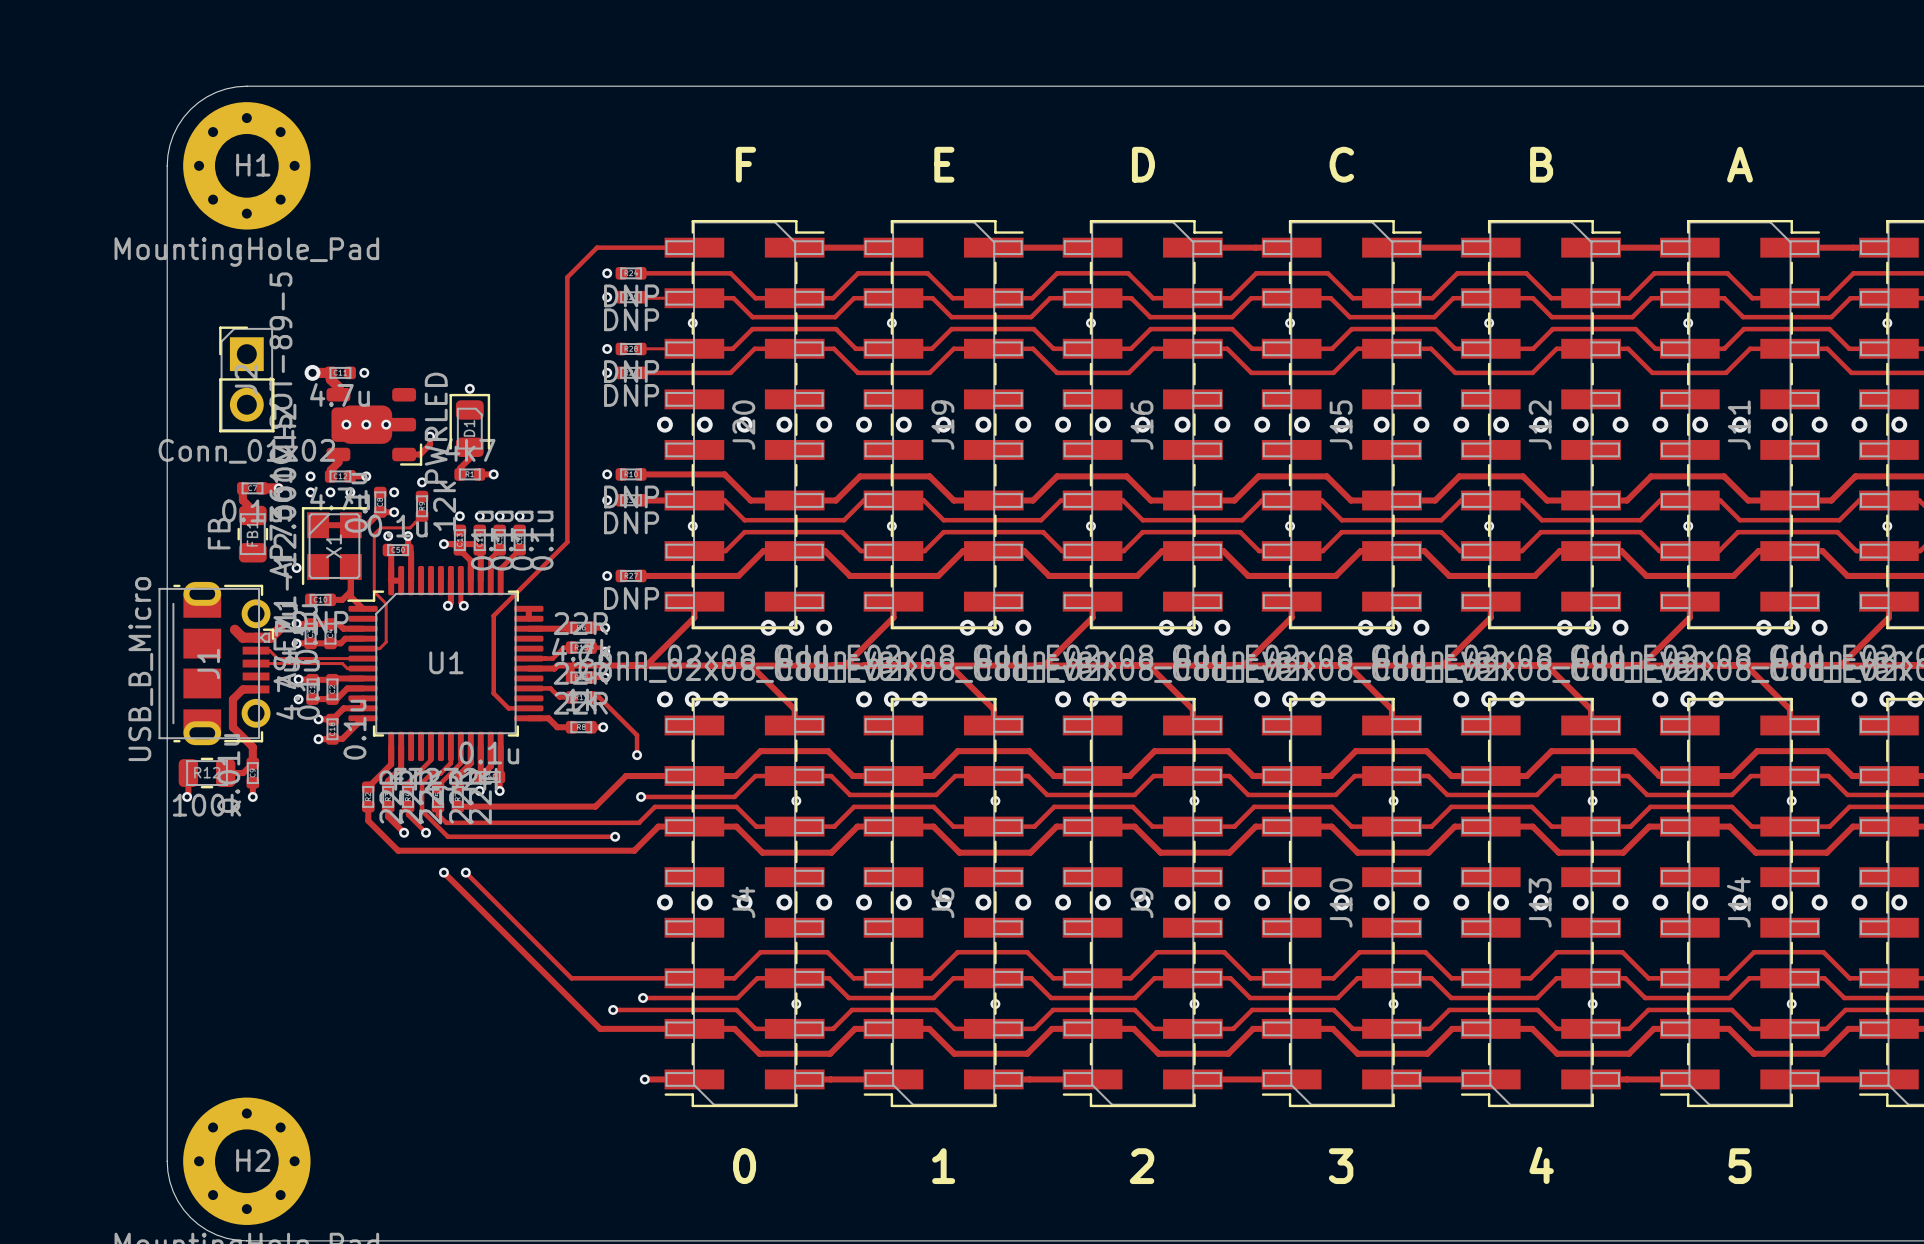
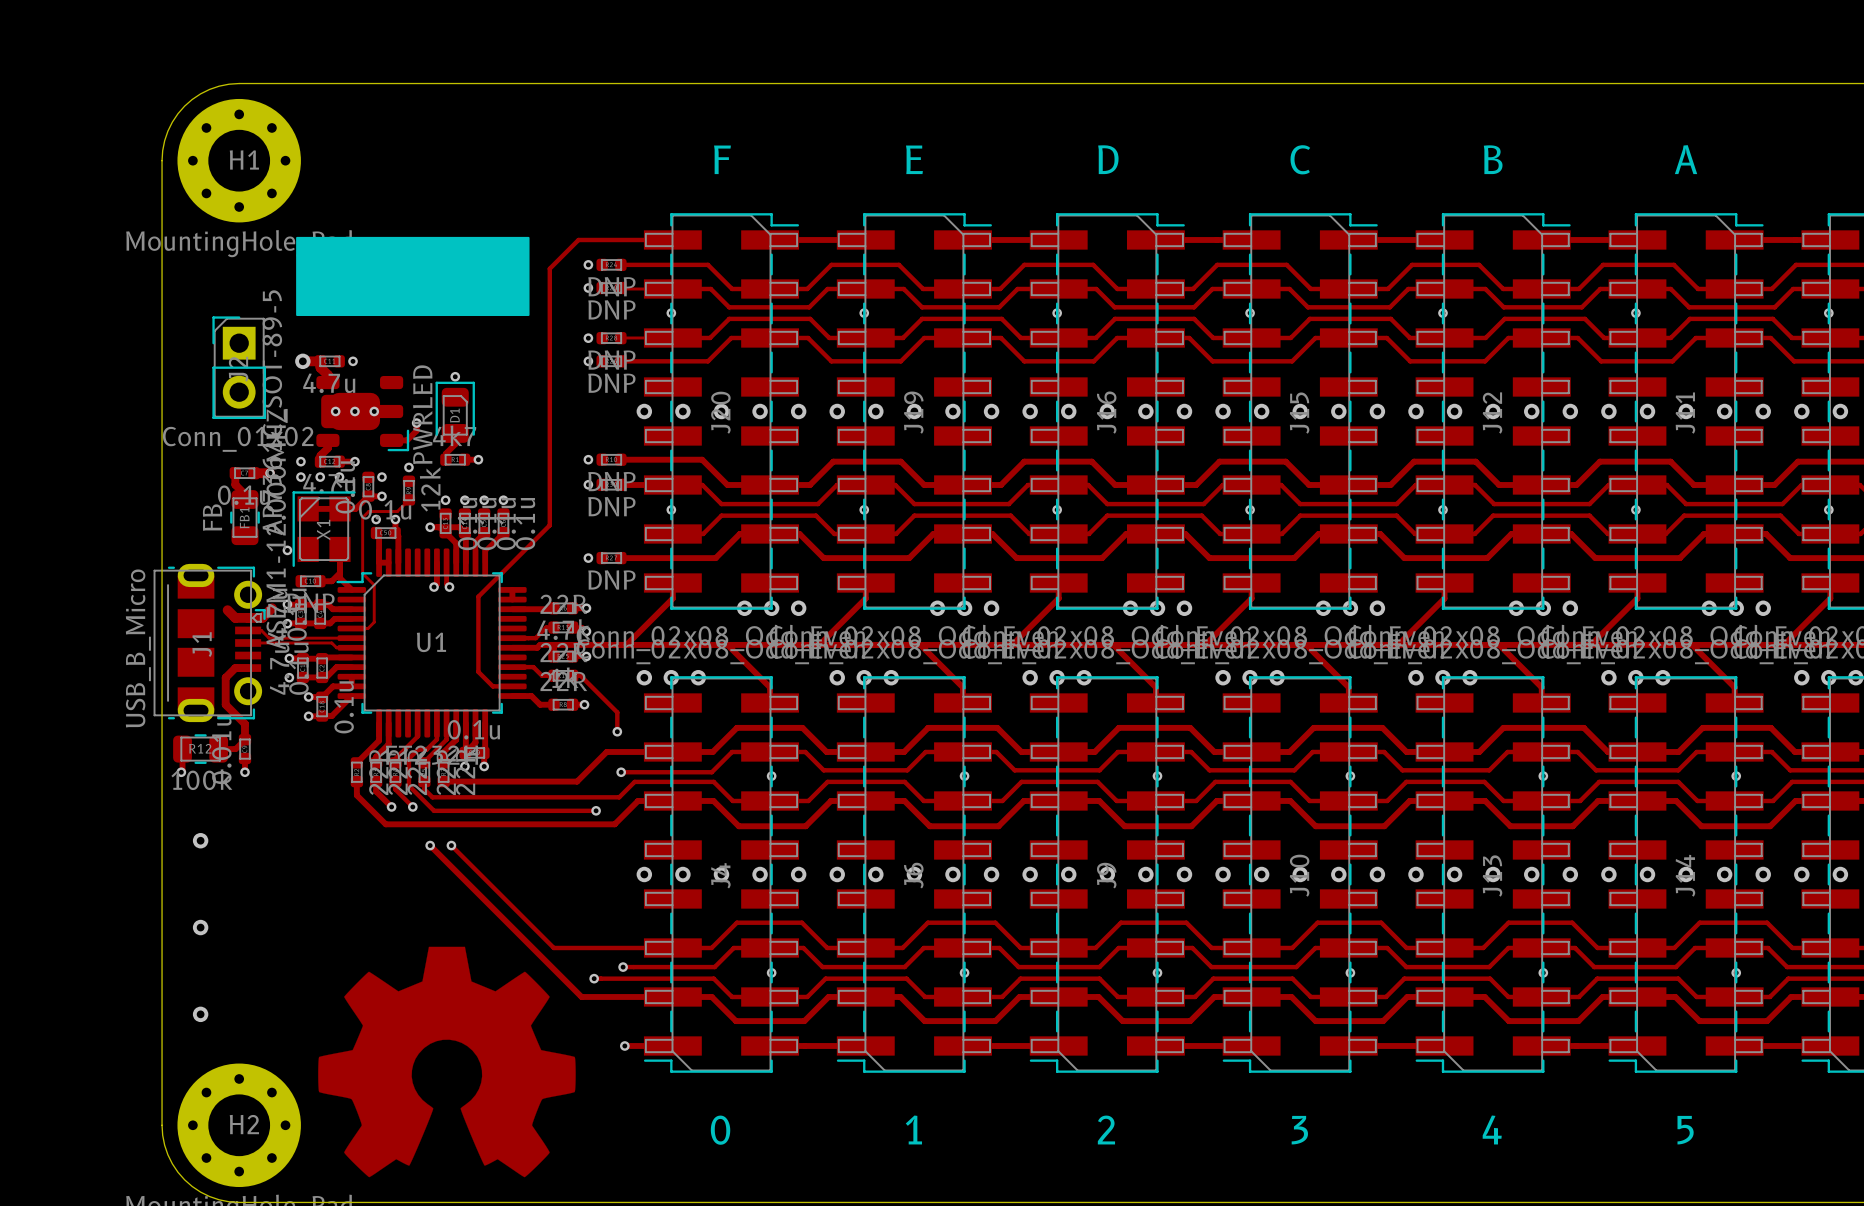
drawing: none -> [296, 236, 530, 316]
via: none -> (200, 840)
via: none -> (200, 927)
drawing: none -> [318, 946, 576, 1178]
via: none -> (200, 1014)

